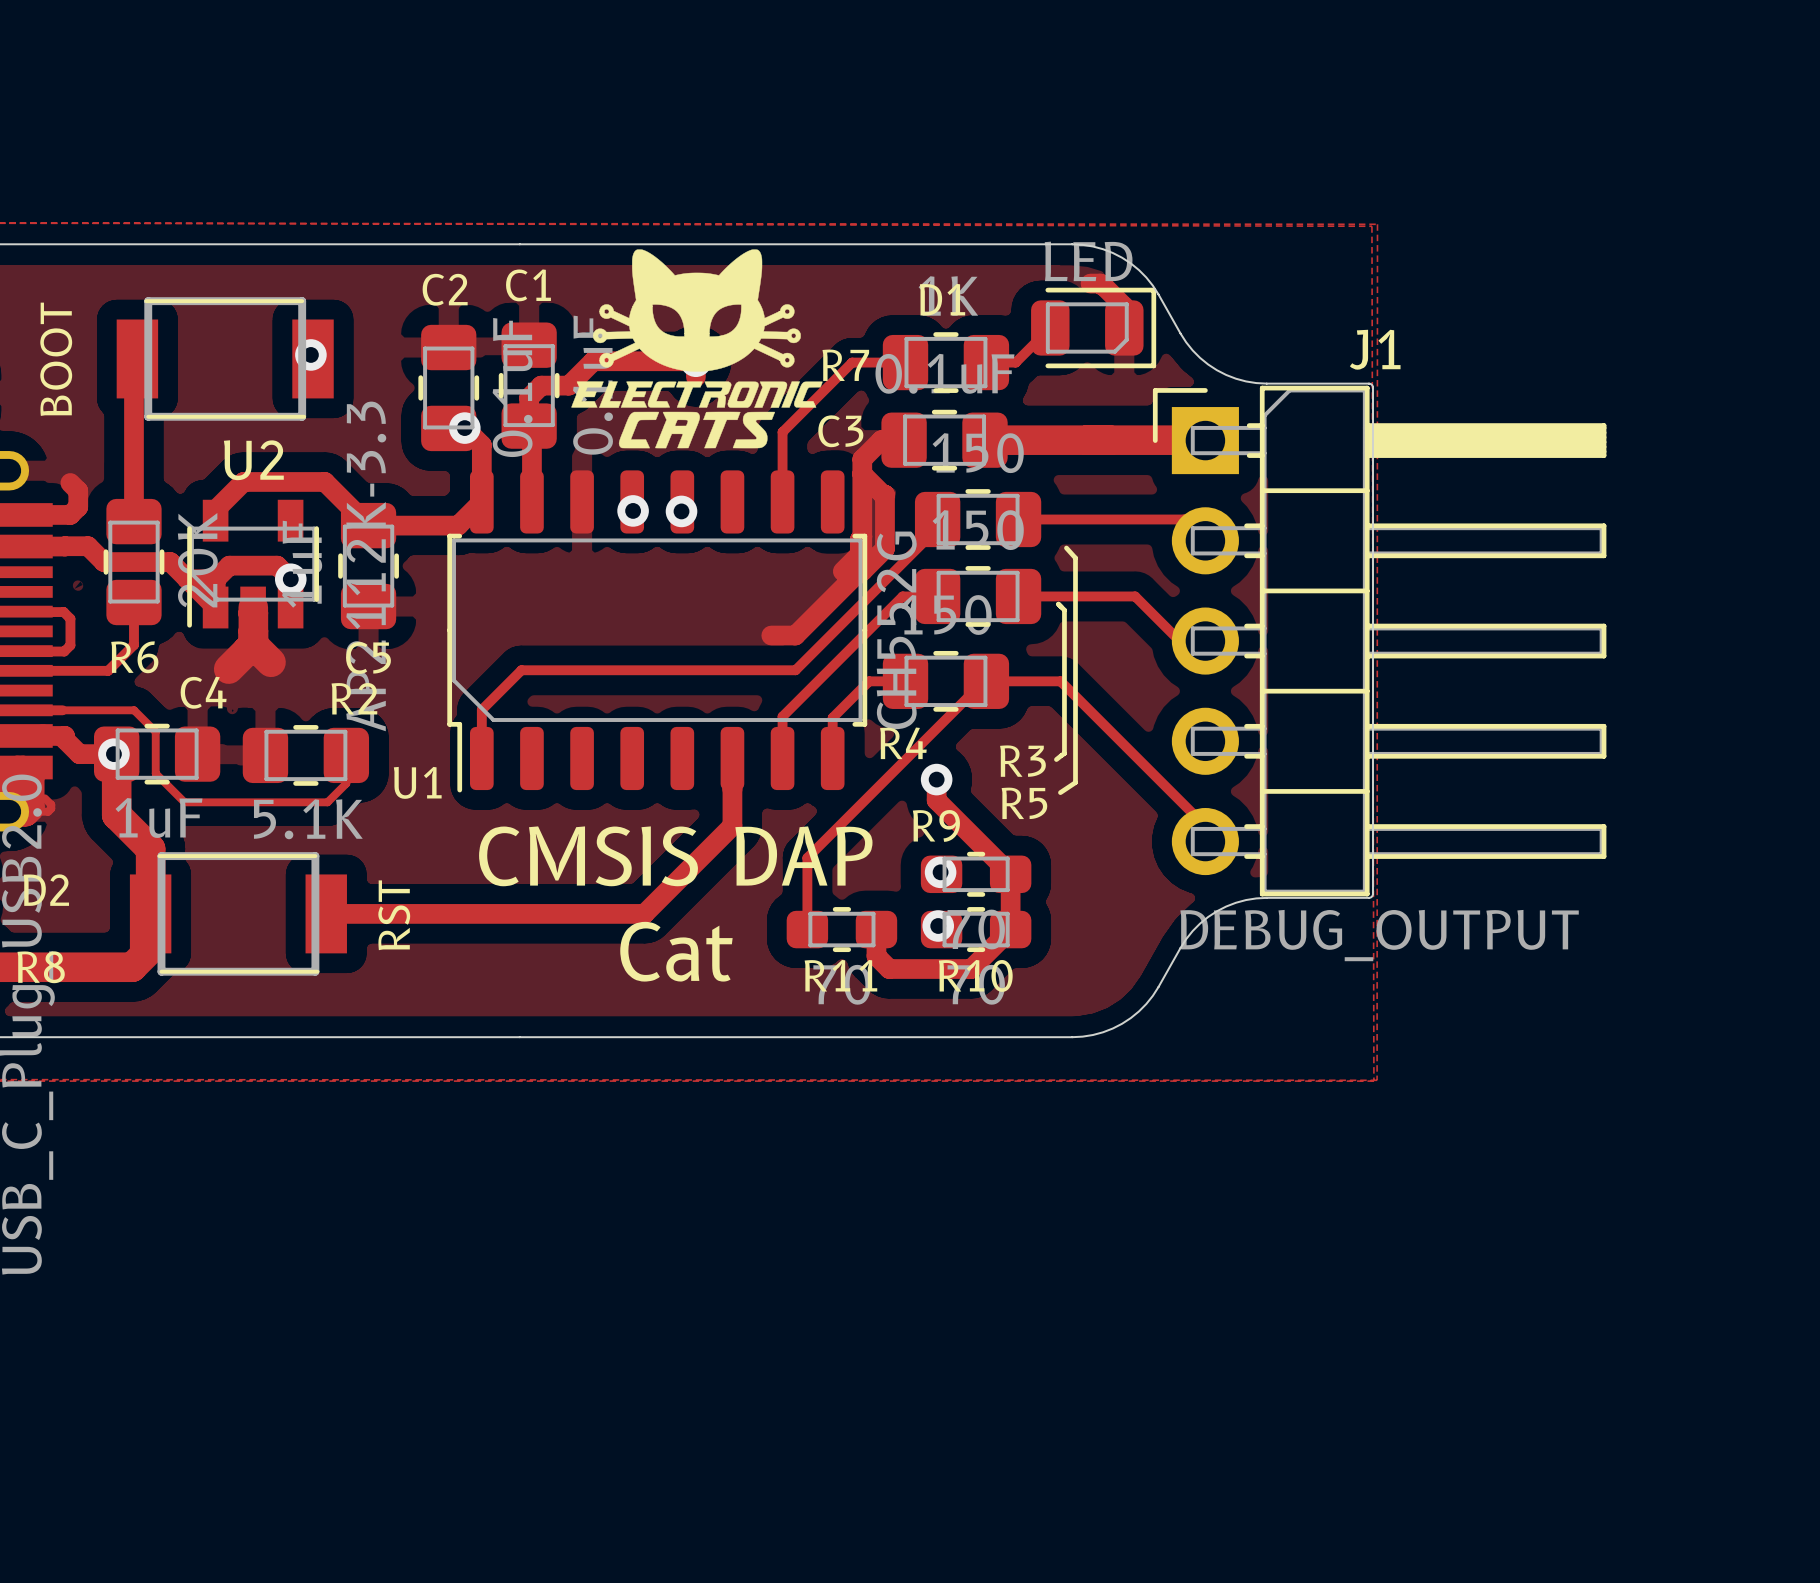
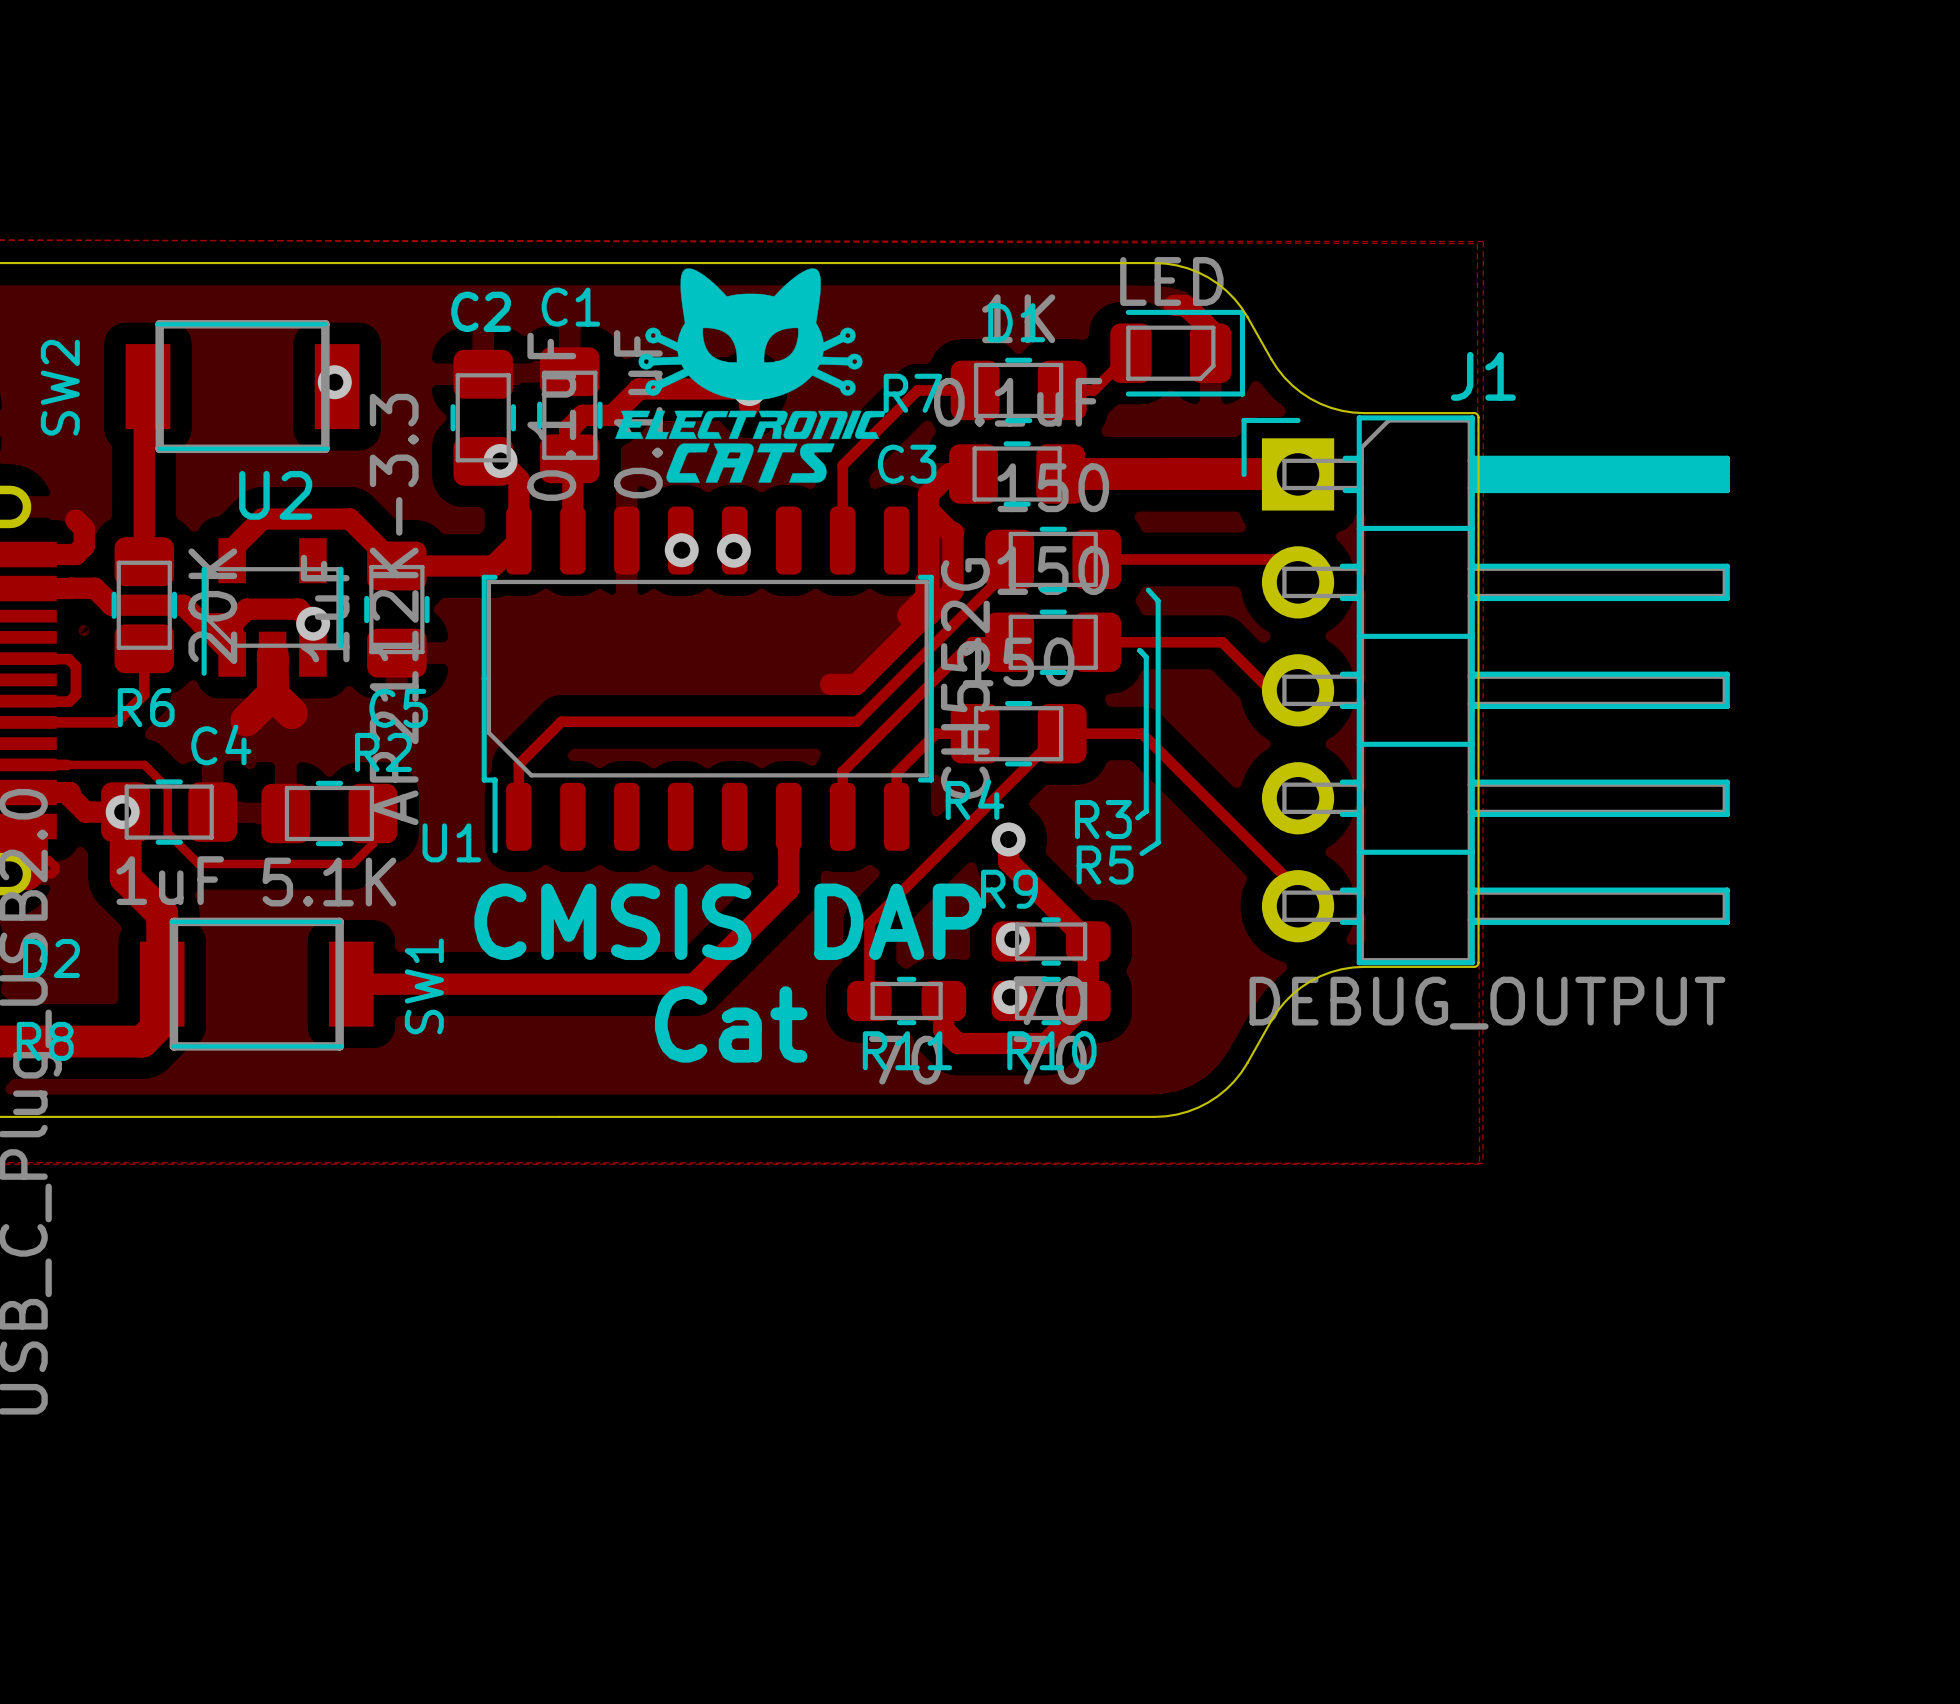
BOOT name: BOOT (56, 359) -> SW2 (60, 387)
RST name: RST (394, 915) -> SW1 (424, 986)

